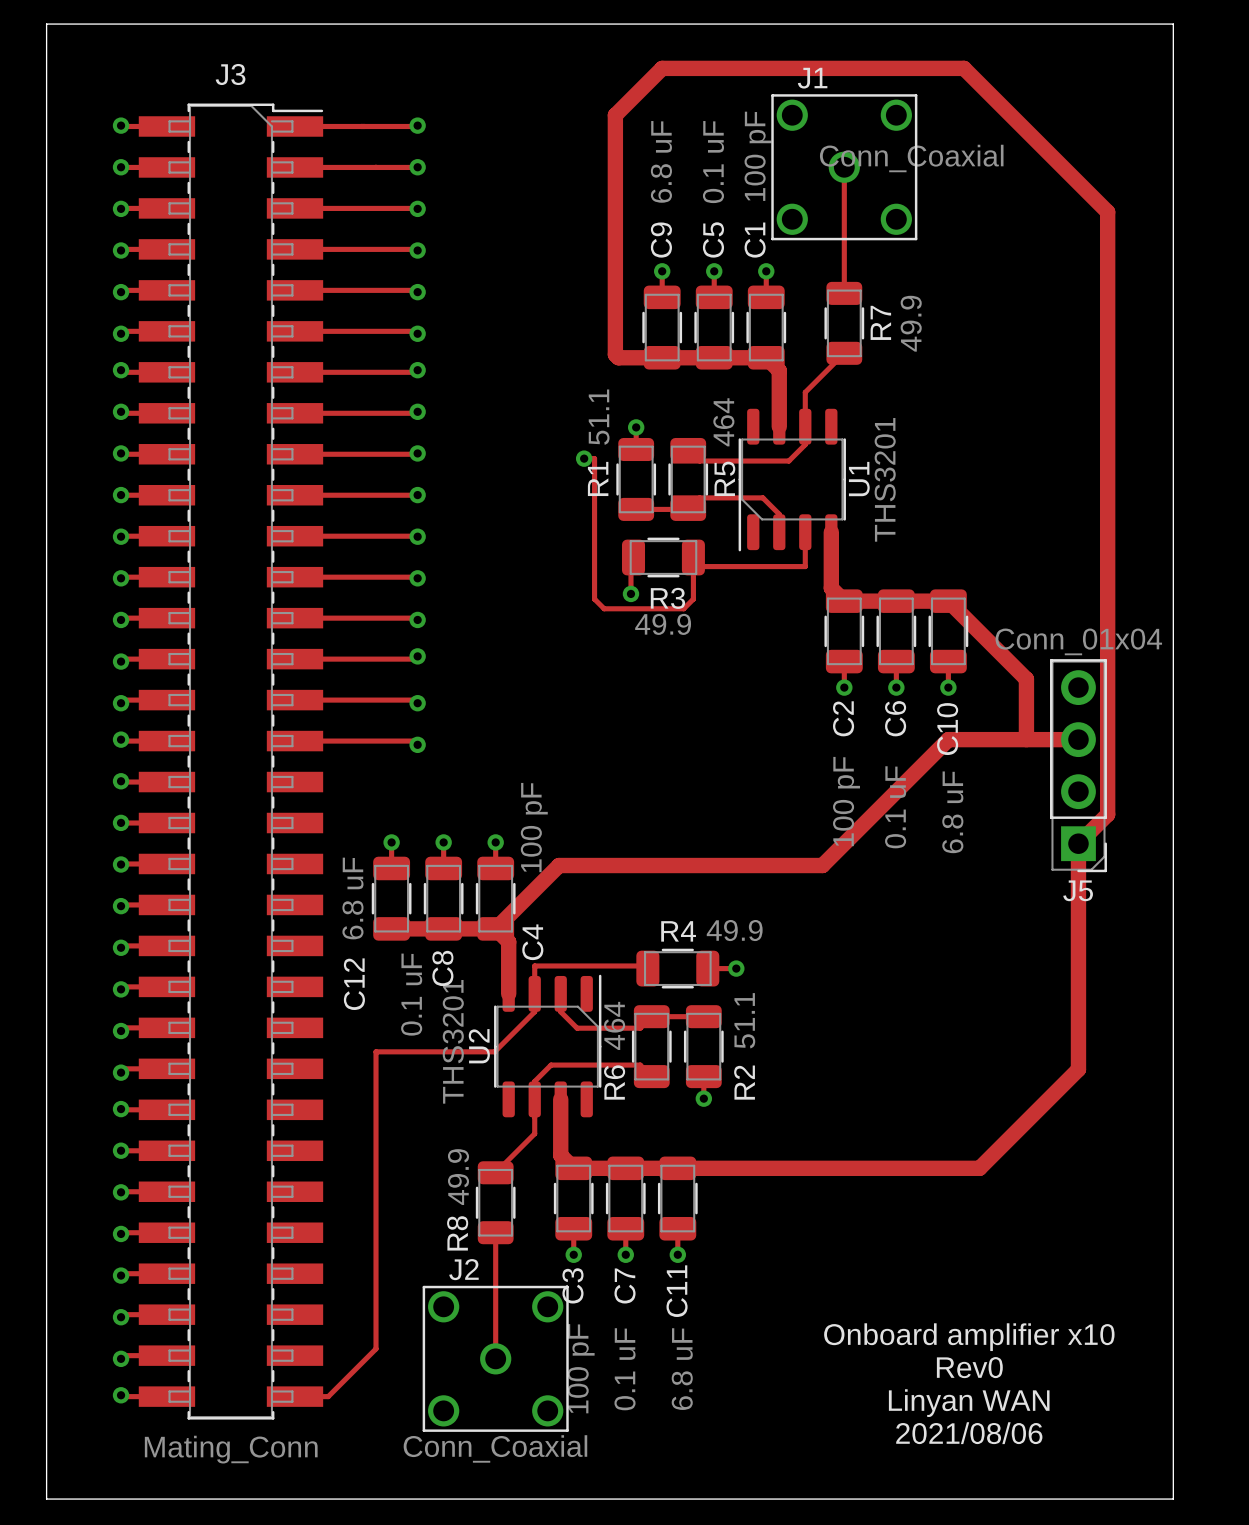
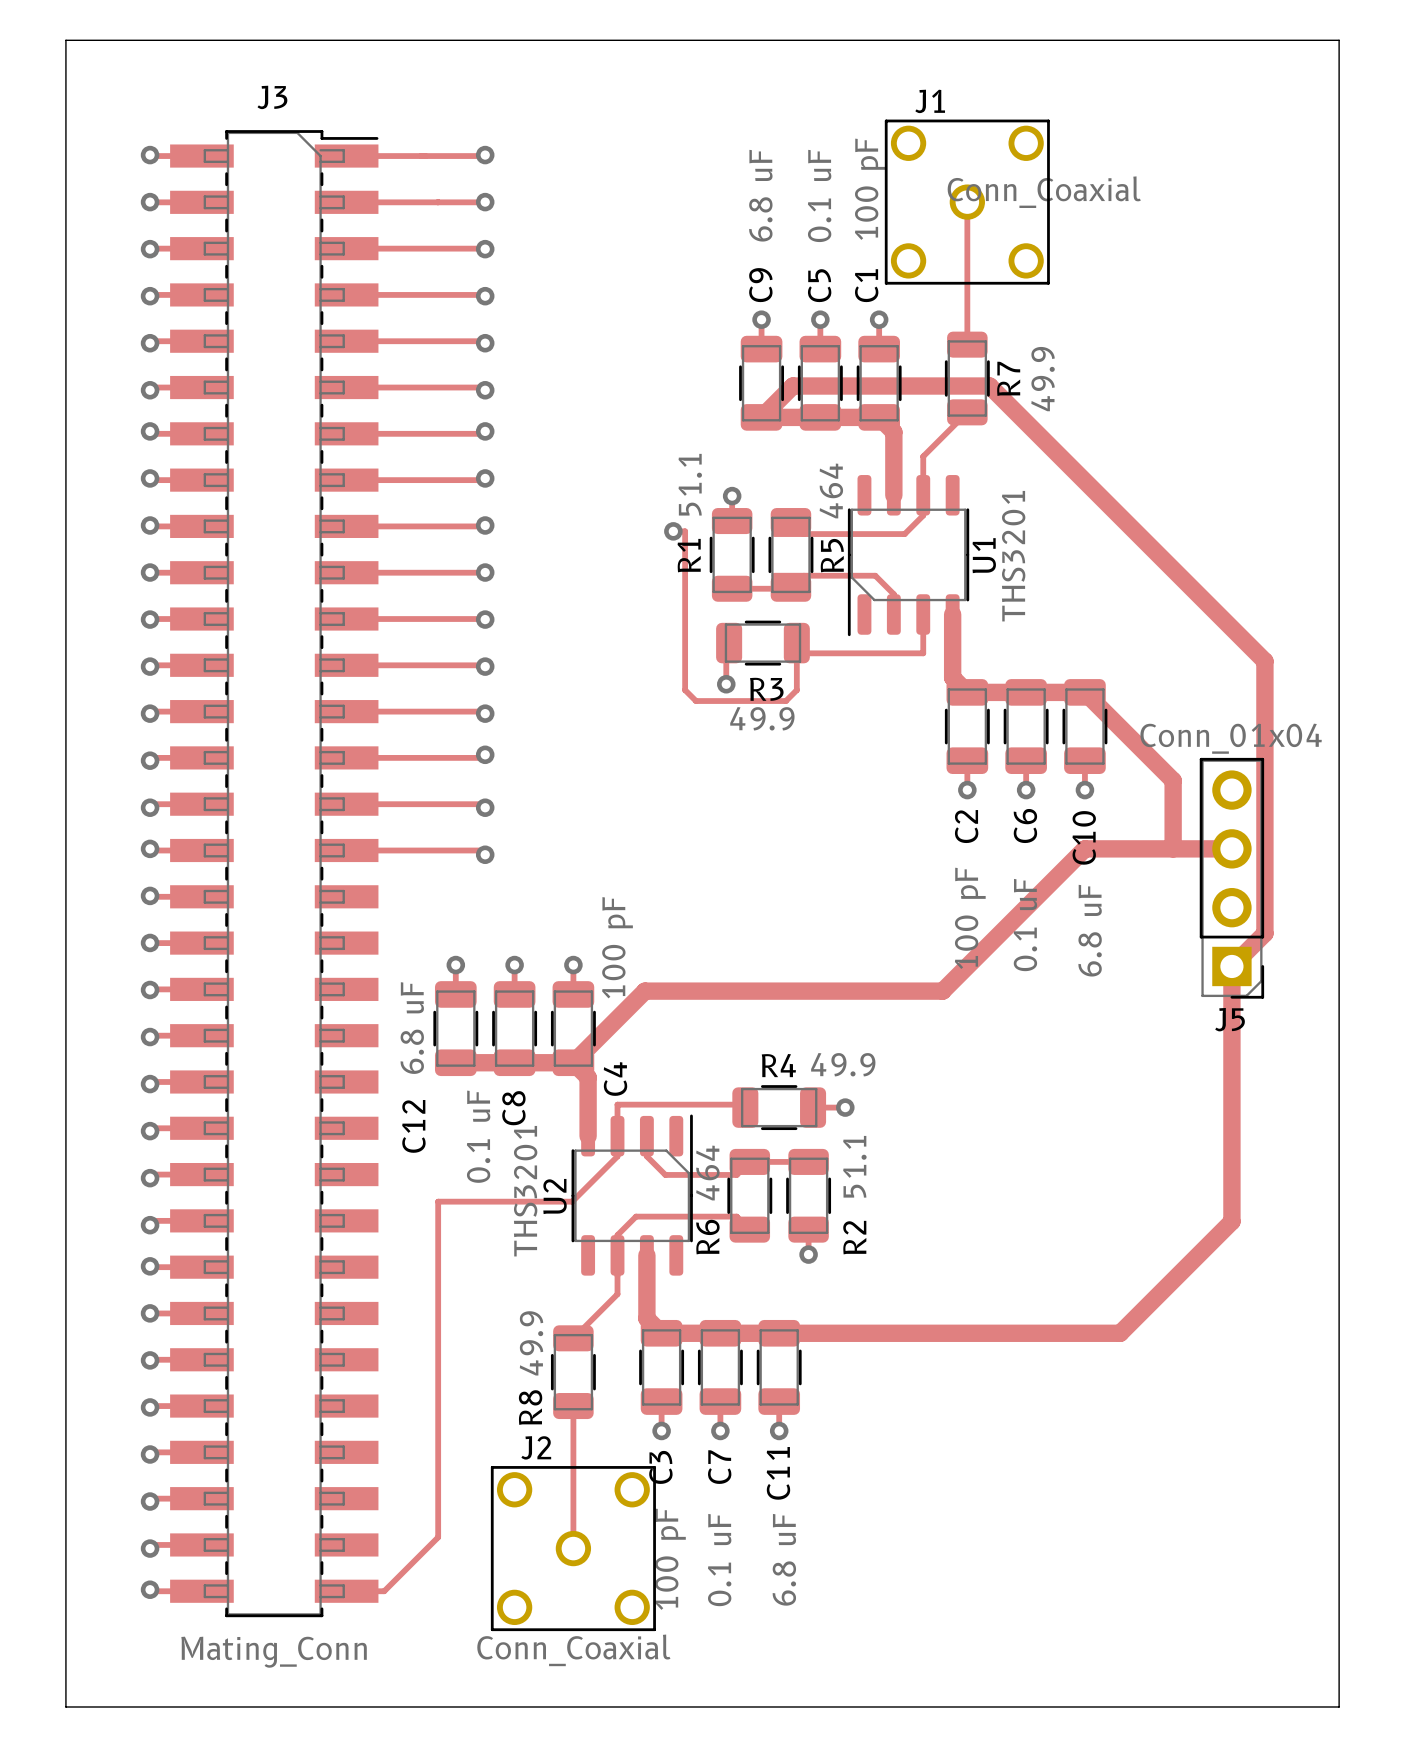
track: (662, 357) (618, 357) (615, 354) (615, 115) (662, 68) (964, 68) (1107, 212) (1107, 573) -> (761, 417) (792, 386) (989, 386) (1264, 661)
text: Onboard amplifier x10 (969, 1337) -> none
text: Rev0 (969, 1367) -> none
text: Linyan WAN (969, 1403) -> none
text: 2021/08/06 (969, 1433) -> none

